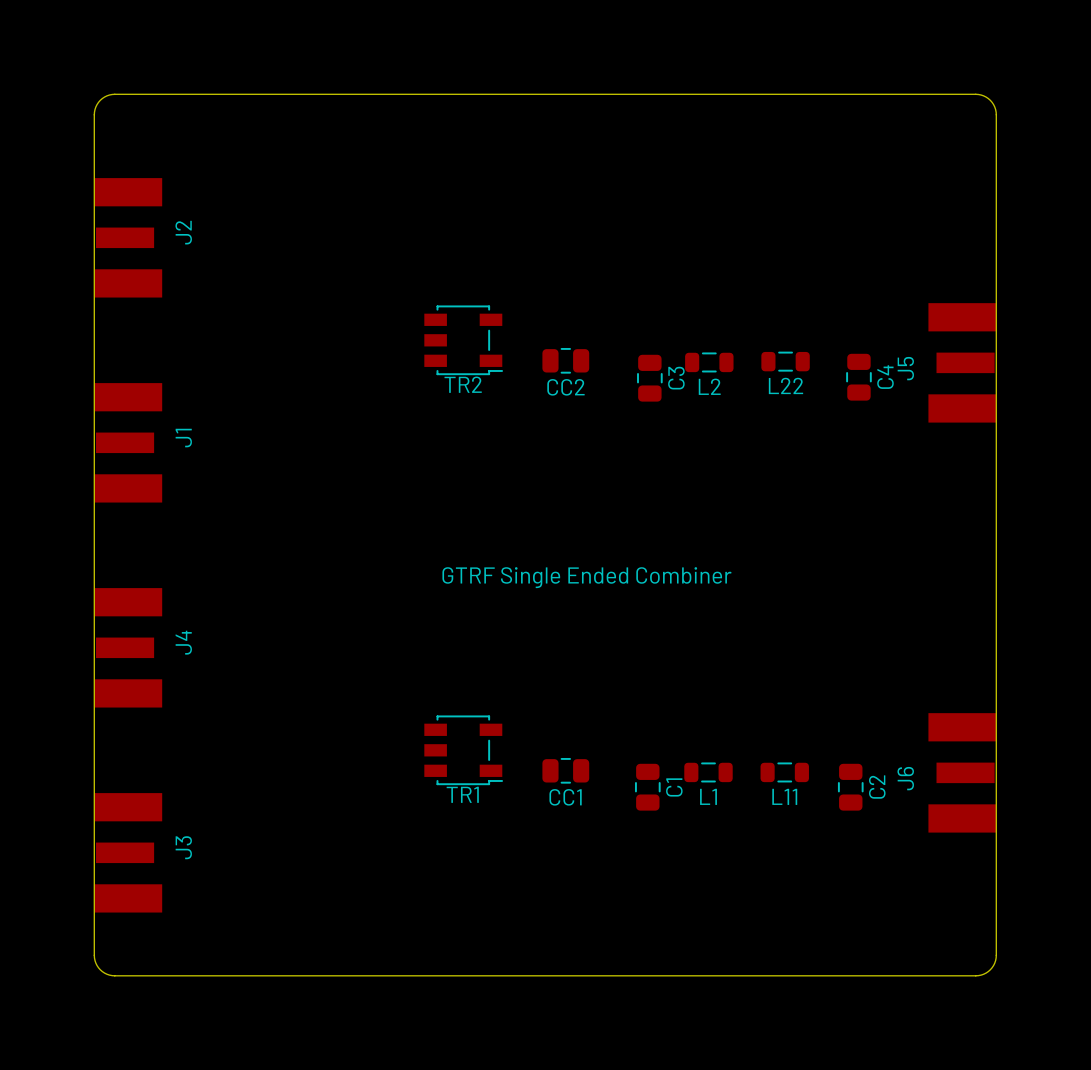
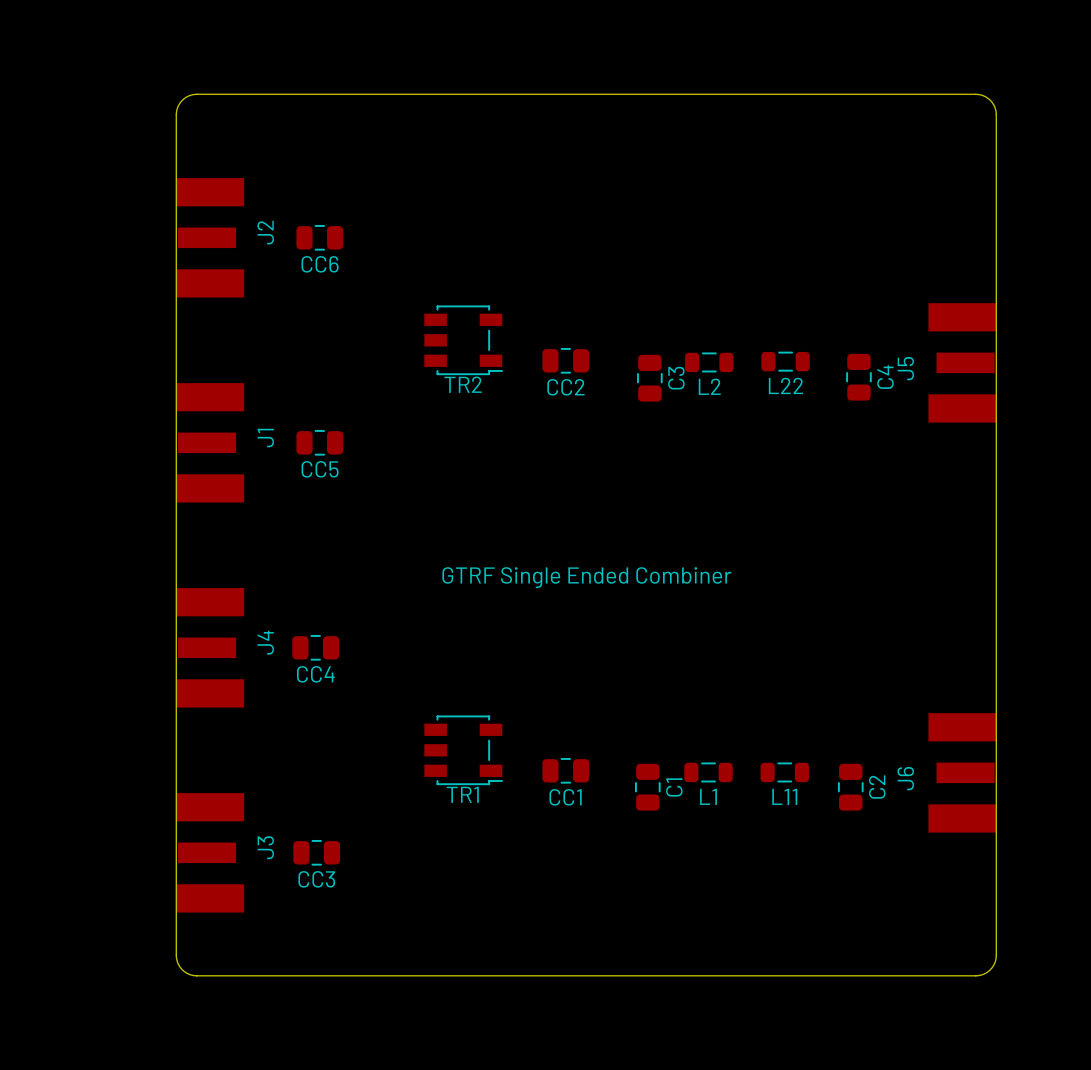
board edge: (196, 94) (112, 94) (100, 100) (94, 112) (94, 955) (98, 967) (109, 975) (196, 975) -> (196, 94) (188, 95) (182, 100) (177, 106) (176, 114) (176, 955) (177, 963) (182, 969) (188, 974) (196, 975)
J2 position: (128, 237) -> (210, 237)
CC6: none -> (319, 237)
J1 position: (128, 442) -> (210, 442)
CC5: none -> (319, 442)
J4 position: (128, 647) -> (210, 647)
CC4: none -> (315, 647)
J3 position: (128, 852) -> (210, 852)
CC3: none -> (316, 852)

